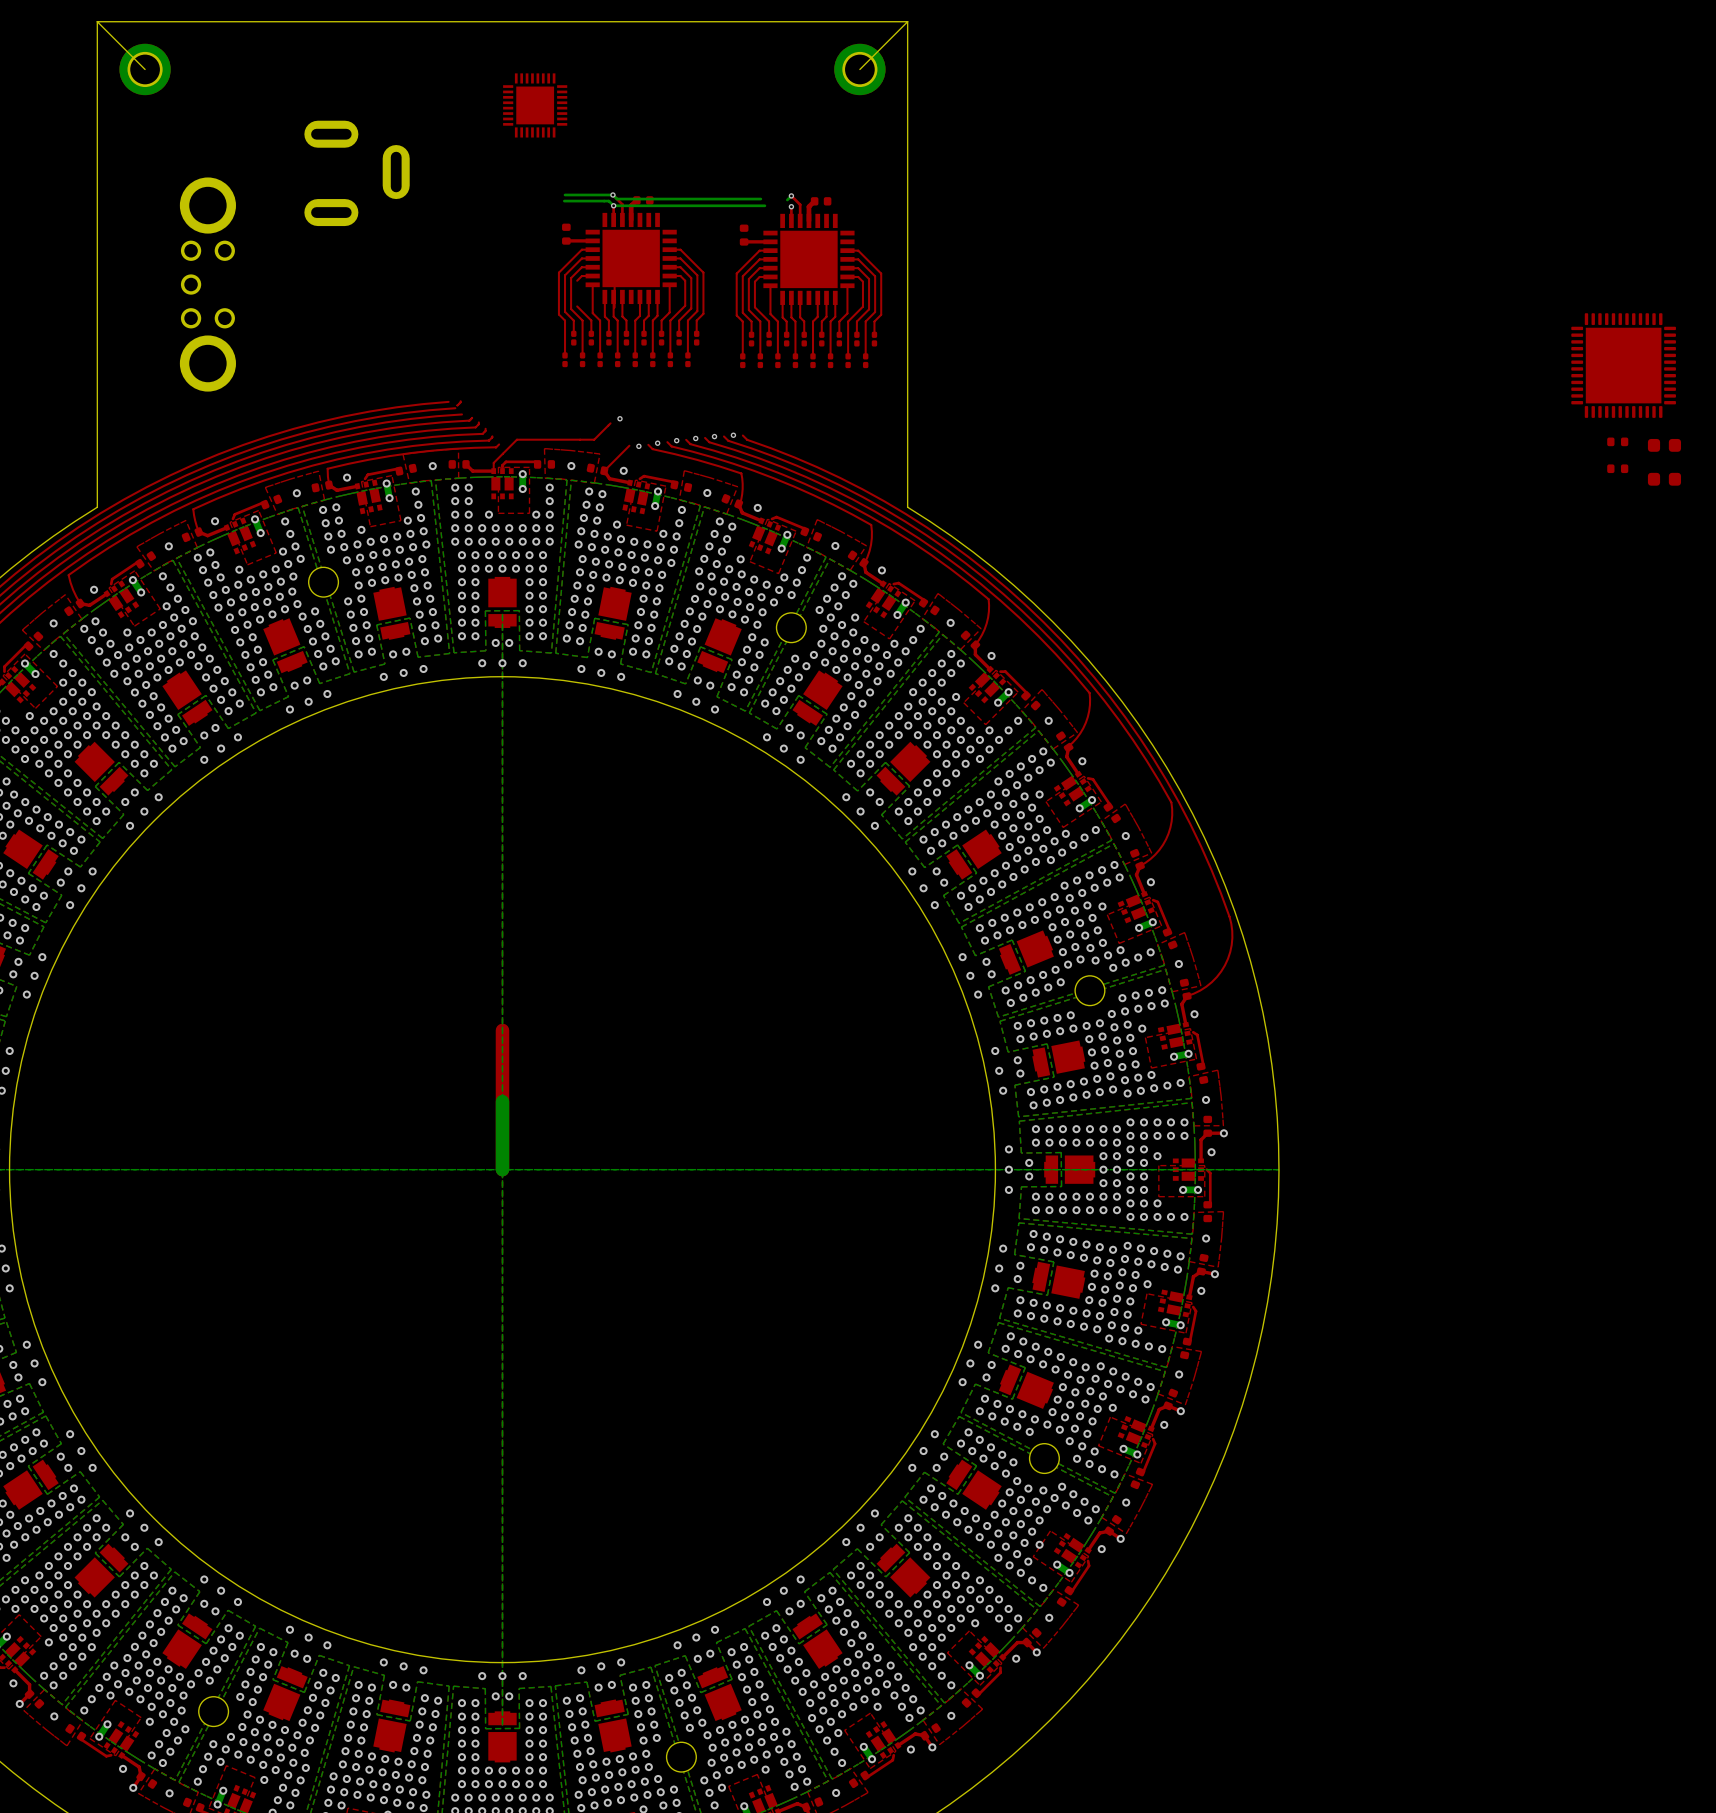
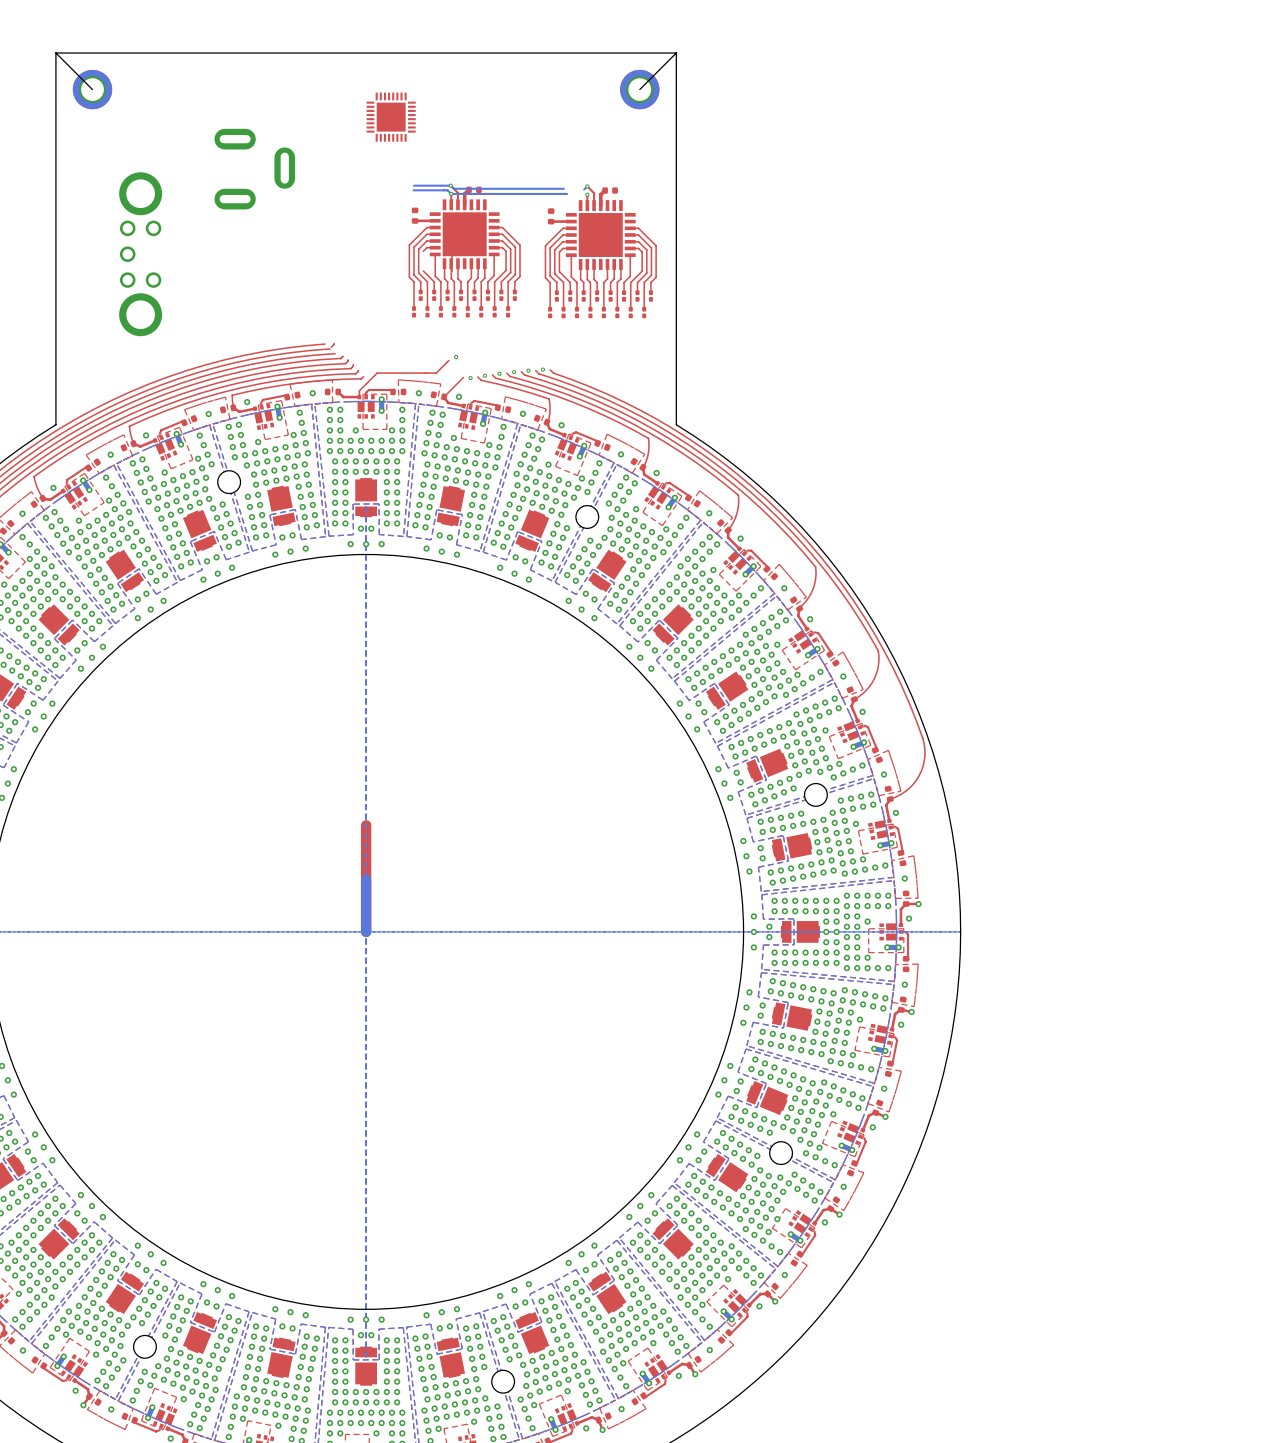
part: (1623, 365) -> none
part: (1617, 441) -> none
part: (1664, 445) -> none
part: (1617, 468) -> none
part: (1664, 479) -> none

